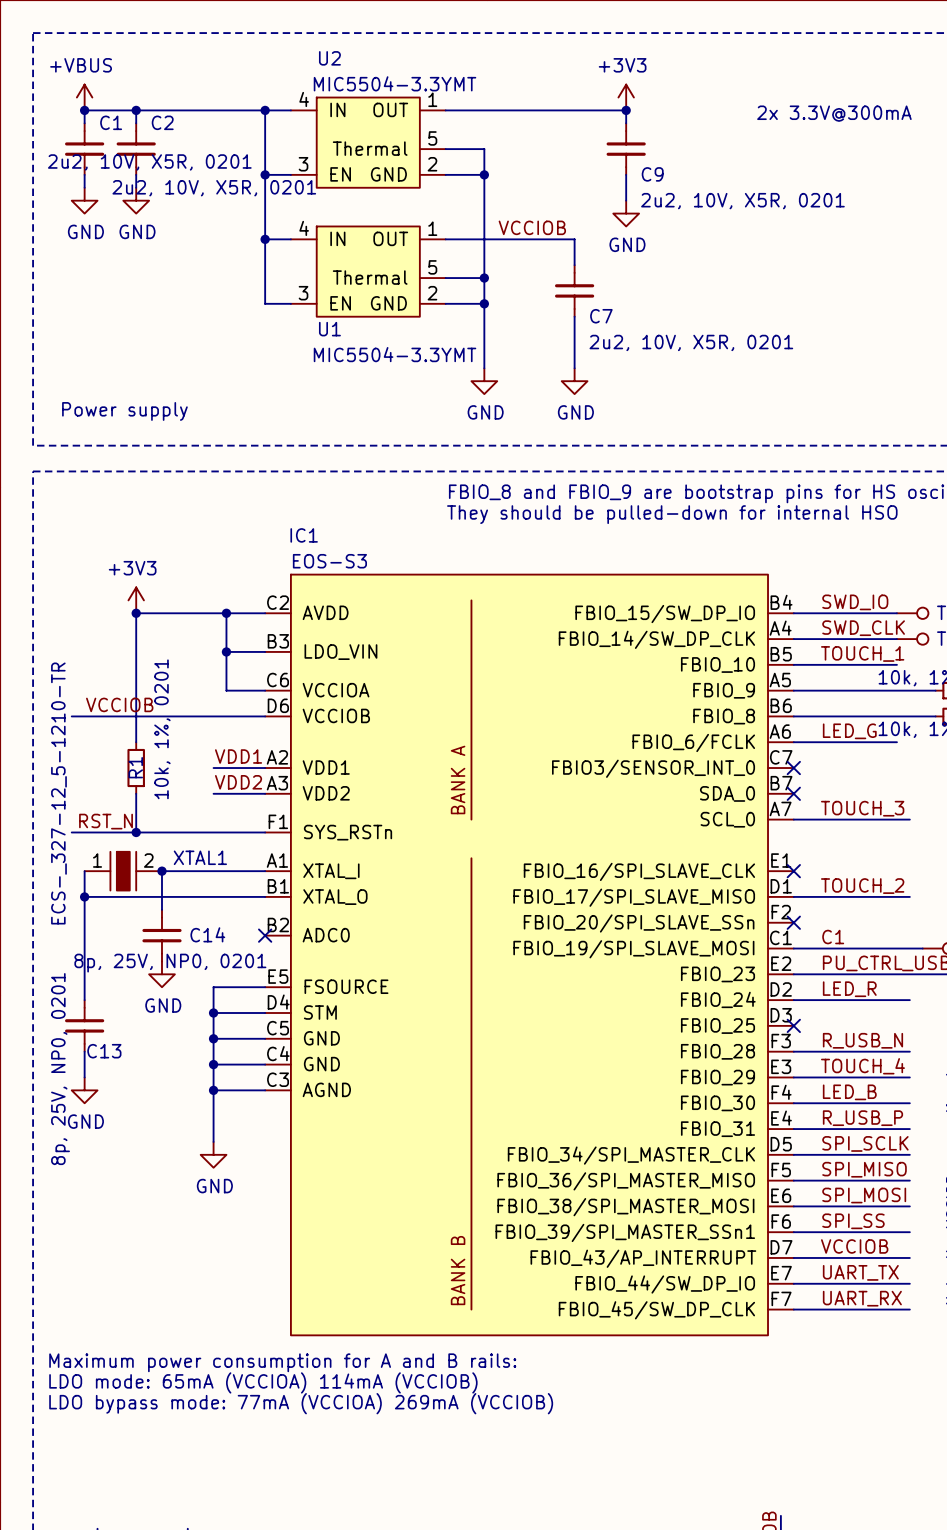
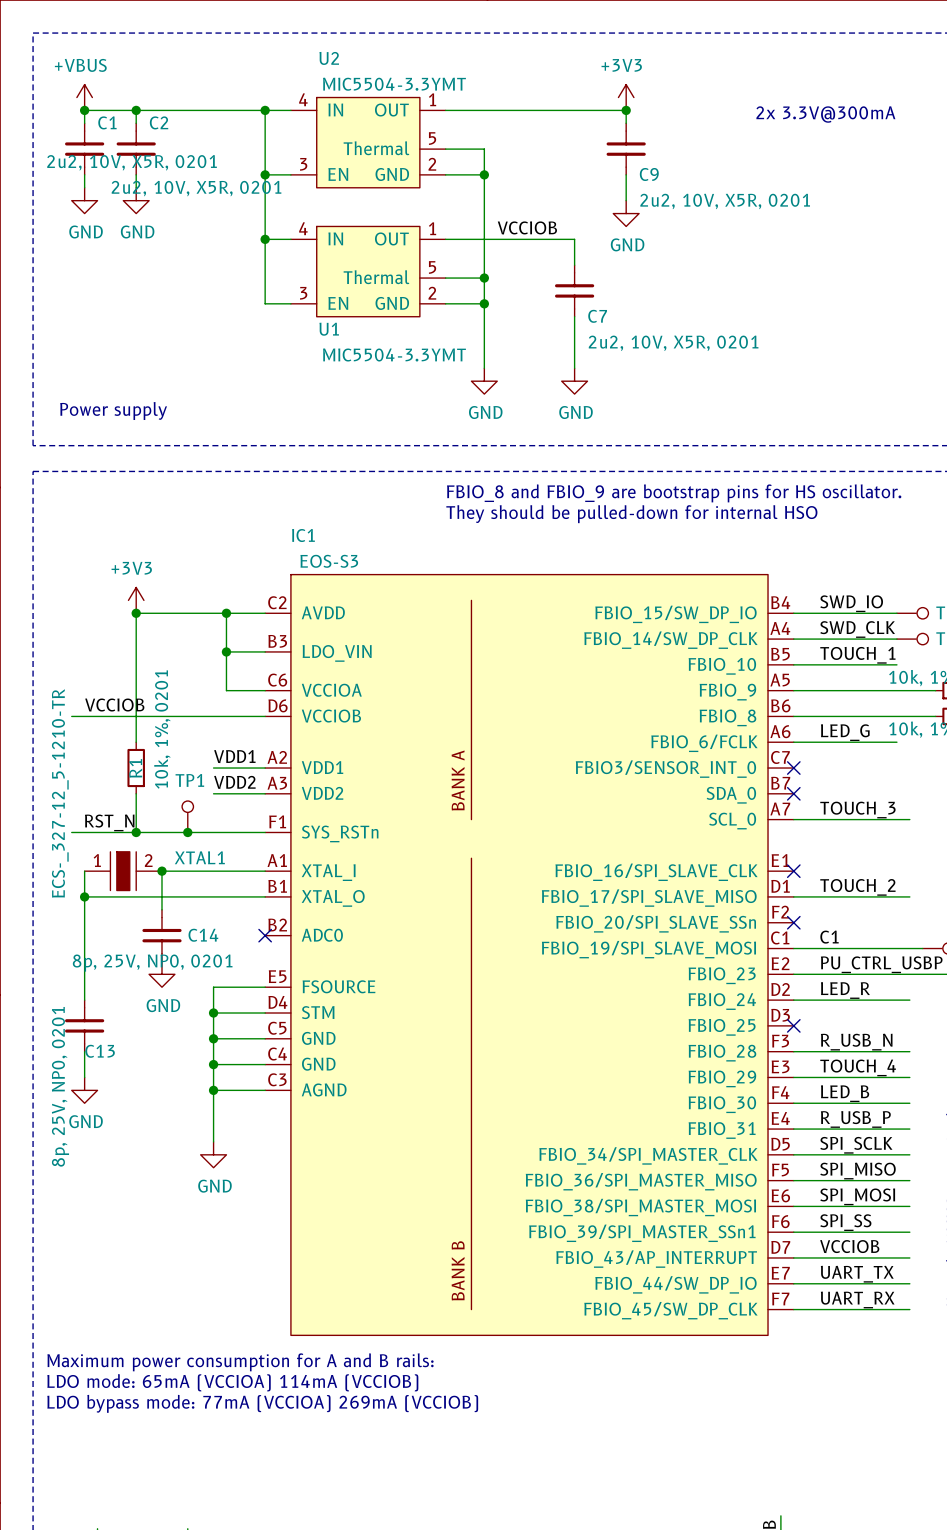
TP1: none -> (187, 816)
junction: none -> (187, 832)

